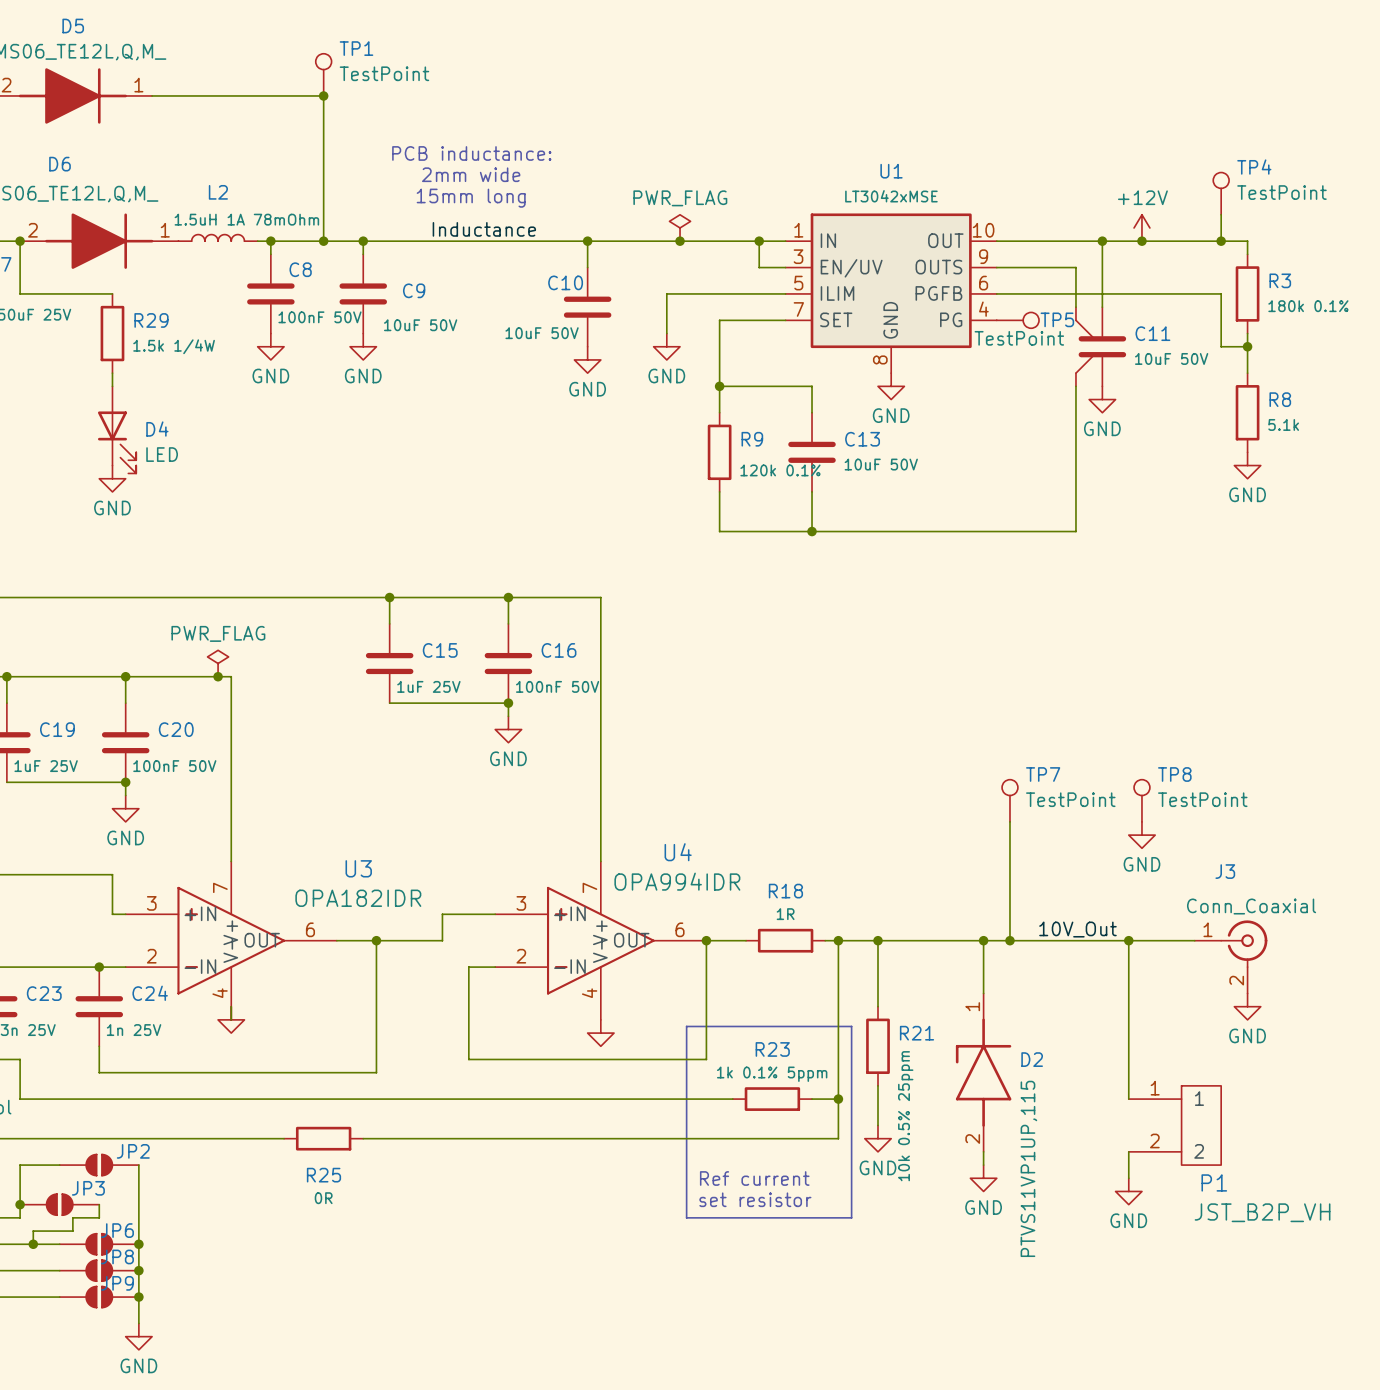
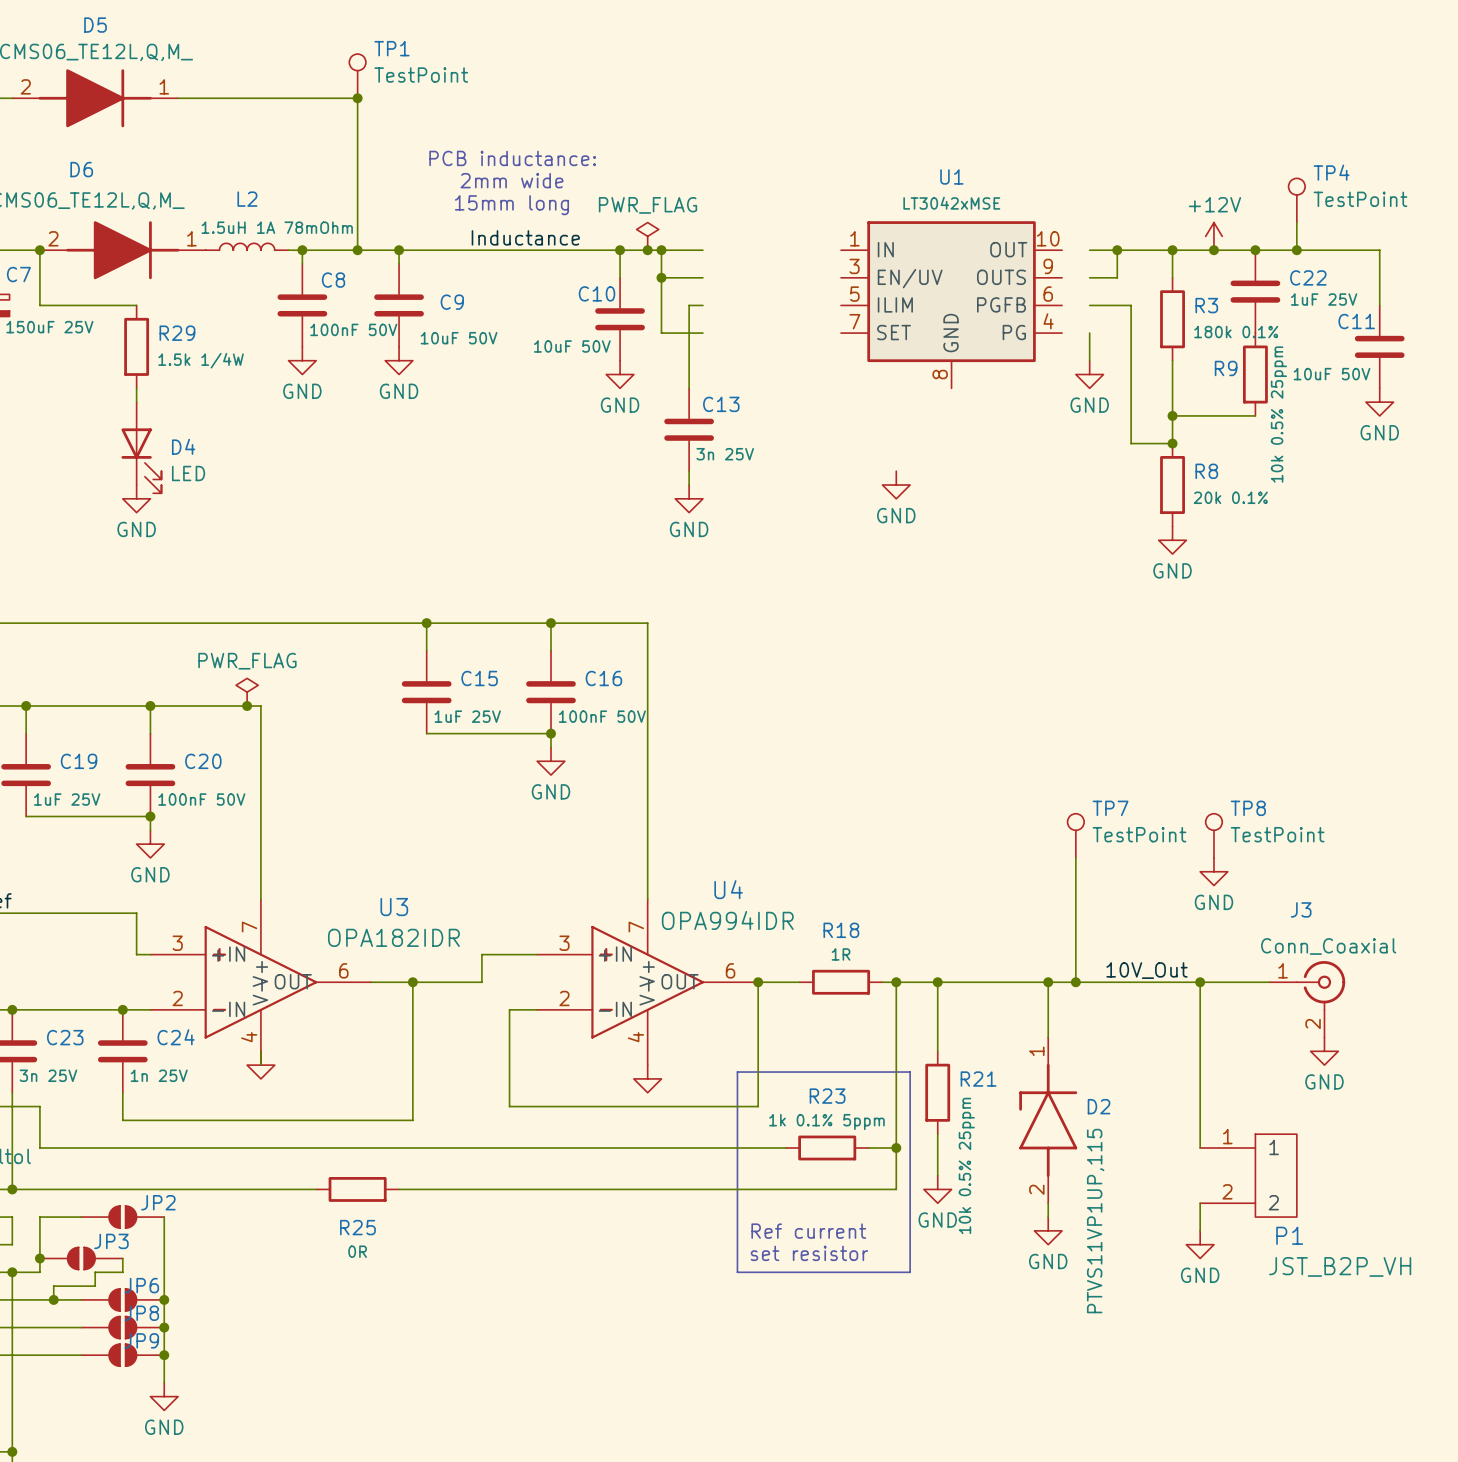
power symbol position: PWR_FLAG (680, 227) -> PWR_FLAG (647, 236)
junction: none -> (620, 250)
wire: (587, 241) (587, 267) -> (620, 250) (620, 277)
junction: (587, 241) -> none
junction: none -> (647, 250)
wire: none -> (661, 250) (661, 333) (702, 333)
junction: none -> (661, 250)
wire: (653, 241) (785, 241) -> none
junction: (680, 241) -> none
wire: (759, 241) (759, 267) (785, 267) -> none
junction: (759, 241) -> none
wire: (996, 241) (1023, 241) -> none
junction: none -> (1117, 250)
junction: none -> (1255, 250)
wire: (1247, 241) (1247, 254) -> (1324, 250) (1379, 250) (1379, 305)
wire: none -> (661, 277) (702, 277)
junction: none -> (661, 277)
wire: (996, 267) (1023, 267) -> none
wire: (1049, 267) (1075, 267) (1075, 307) -> (1117, 277) (1117, 250)
wire: (1102, 267) (1102, 307) -> none
C22: none -> 1uF 25V (1255, 291)
wire: none -> (702, 305) (689, 305) (689, 388)
wire: (785, 293) (666, 293) (666, 333) -> none
wire: (996, 293) (1023, 293) -> none
wire: (1062, 293) (1221, 293) (1221, 346) (1247, 346) -> (1131, 305) (1131, 443) (1172, 443) (1172, 360)
R3 position: (1247, 293) -> (1172, 319)
C10 position: (587, 307) -> (620, 319)
C11 symbol: [1075, 307, 1127, 387] -> [1354, 305, 1405, 389]
wire: (785, 320) (719, 320) (719, 412) -> none
TP5: TestPoint (1017, 320) -> none
wire: none -> (1089, 333) (1089, 360)
C11 name position: C11 (1152, 333) -> C11 (1356, 321)
wire: (1247, 333) (1247, 373) -> none
power symbol: GND (666, 346) -> none
junction: (1247, 346) -> none
C11 value position: 10uF 50V (1171, 358) -> 10uF 50V (1332, 374)
power symbol position: GND (587, 359) -> GND (620, 374)
power symbol: none -> GND (1089, 374)
wire: (719, 386) (812, 386) (812, 412) -> none
junction: (719, 386) -> none
power symbol: GND (891, 386) -> none
wire: (1075, 386) (1075, 531) (719, 531) (719, 491) -> none
power symbol: none -> GND (1379, 402)
wire: none -> (1172, 415) (1255, 415)
junction: none -> (1172, 415)
power symbol: GND (1102, 399) -> none
R8 position: (1247, 412) -> (1172, 485)
R8 value: 5.1k (1283, 424) -> 20k 0.1% (1230, 497)
junction: none -> (1172, 443)
R9 name position: R9 (752, 439) -> R9 (1226, 368)
C13 name position: C13 (862, 439) -> C13 (721, 404)
wire: none -> (689, 471) (689, 485)
R9 position: (719, 452) -> (1255, 374)
C13 position: (812, 452) -> (689, 429)
C13 value: 10uF 50V (881, 464) -> 3n 25V (725, 454)
power symbol: none -> GND (896, 485)
power symbol: GND (1247, 465) -> none
R9 value: 120k 0.1% (780, 470) -> 10k 0.5% 25ppm (1278, 414)
power symbol: none -> GND (689, 498)
wire: (812, 491) (812, 531) -> none
power symbol: none -> GND (1172, 540)
junction: (812, 531) -> none

